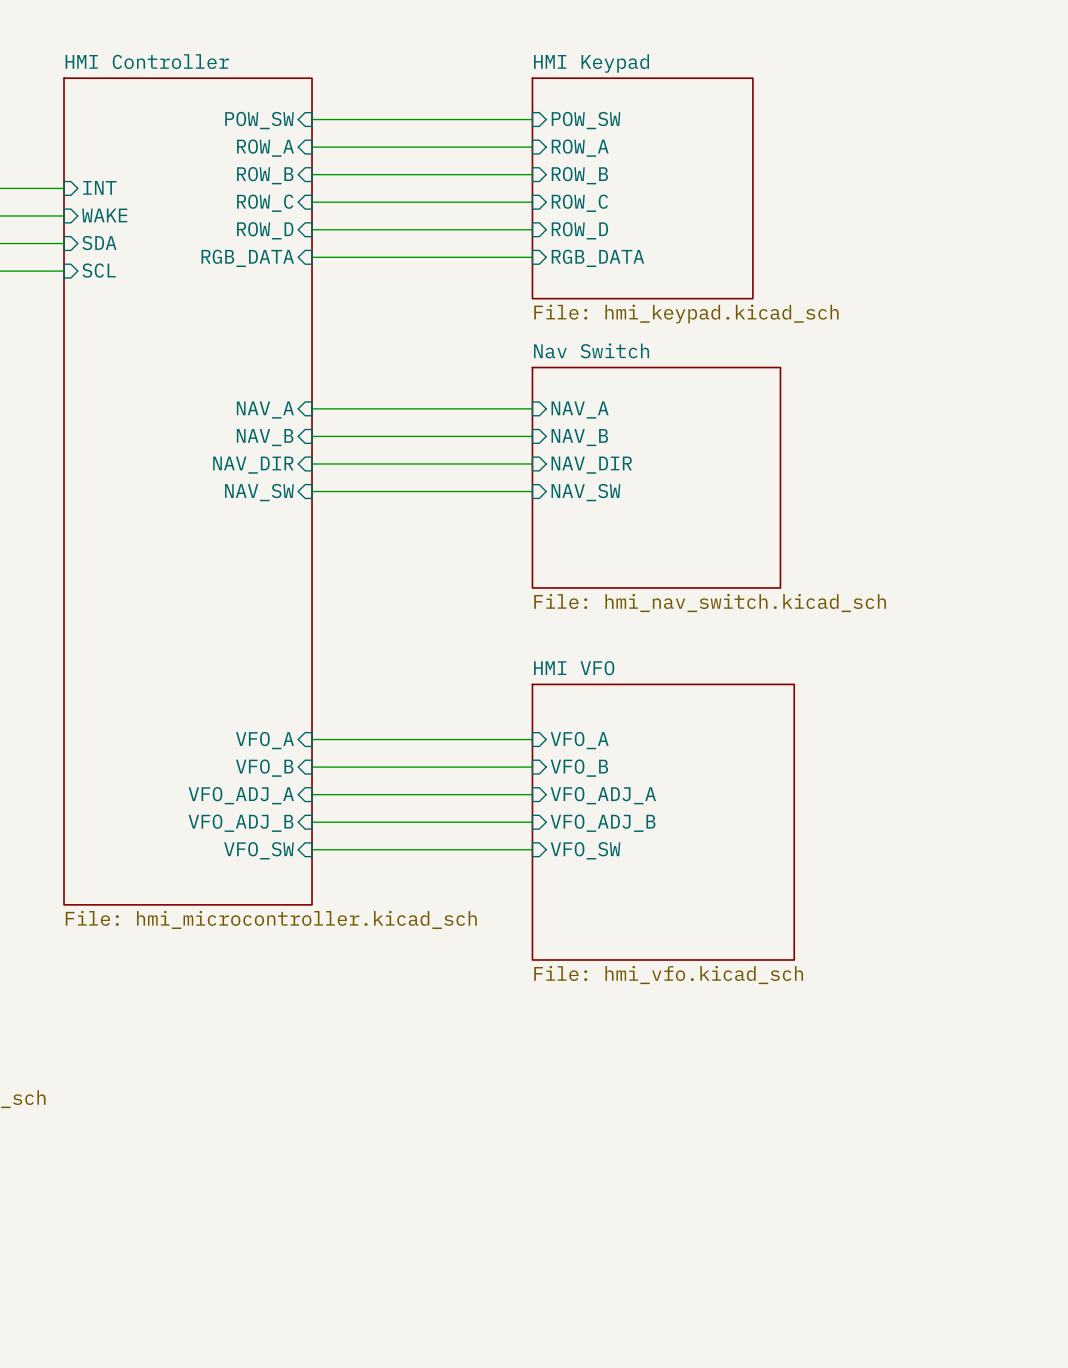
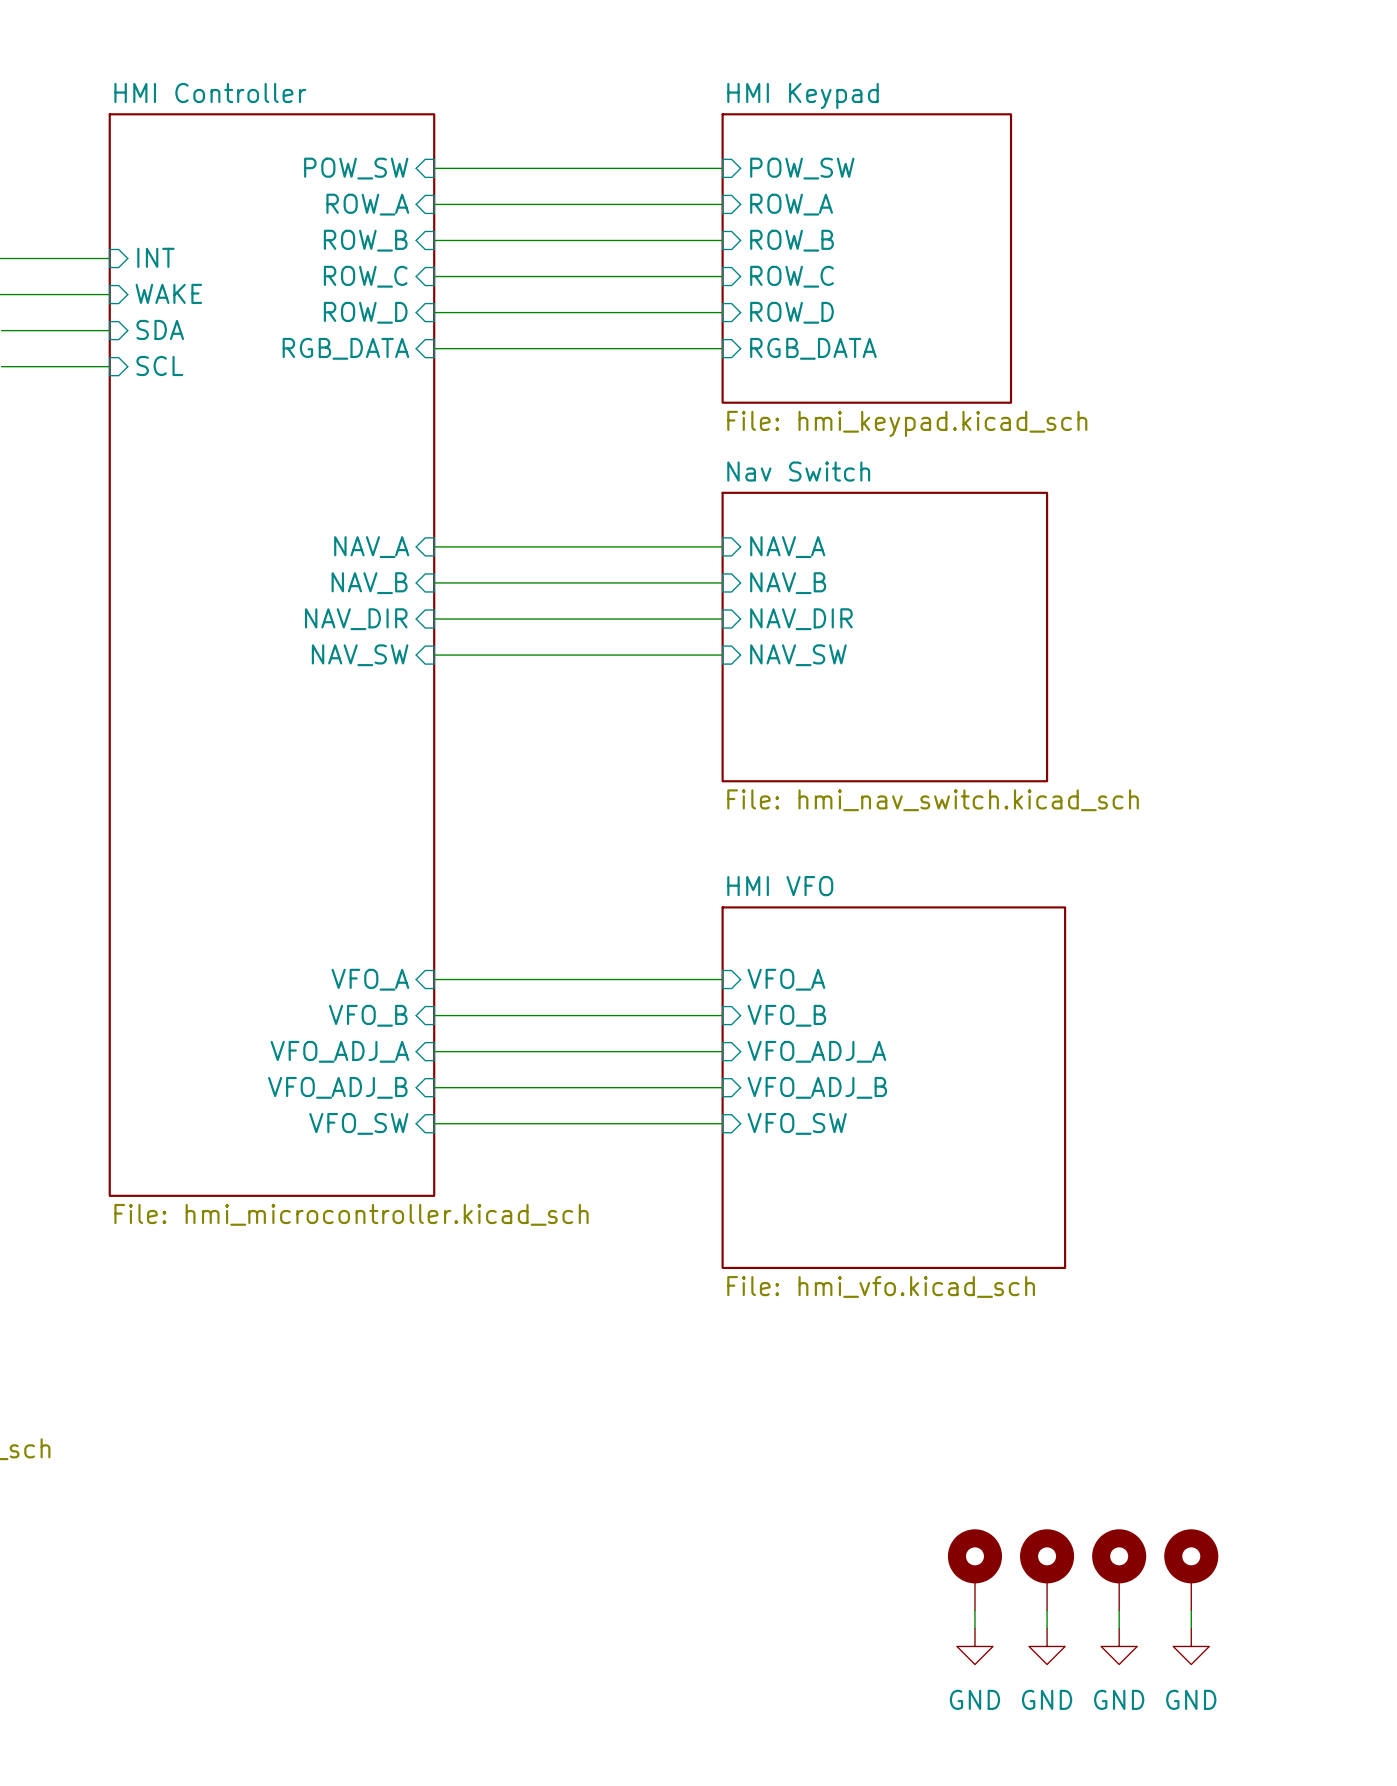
part: none -> (974, 1569)
part: none -> (1047, 1569)
part: none -> (1119, 1569)
part: none -> (1191, 1569)
wire: none -> (974, 1610) (974, 1628)
wire: none -> (1047, 1610) (1047, 1628)
wire: none -> (1119, 1610) (1119, 1628)
wire: none -> (1191, 1610) (1191, 1628)
power symbol: none -> GND (974, 1646)
power symbol: none -> GND (1047, 1646)
power symbol: none -> GND (1119, 1646)
power symbol: none -> GND (1191, 1646)

